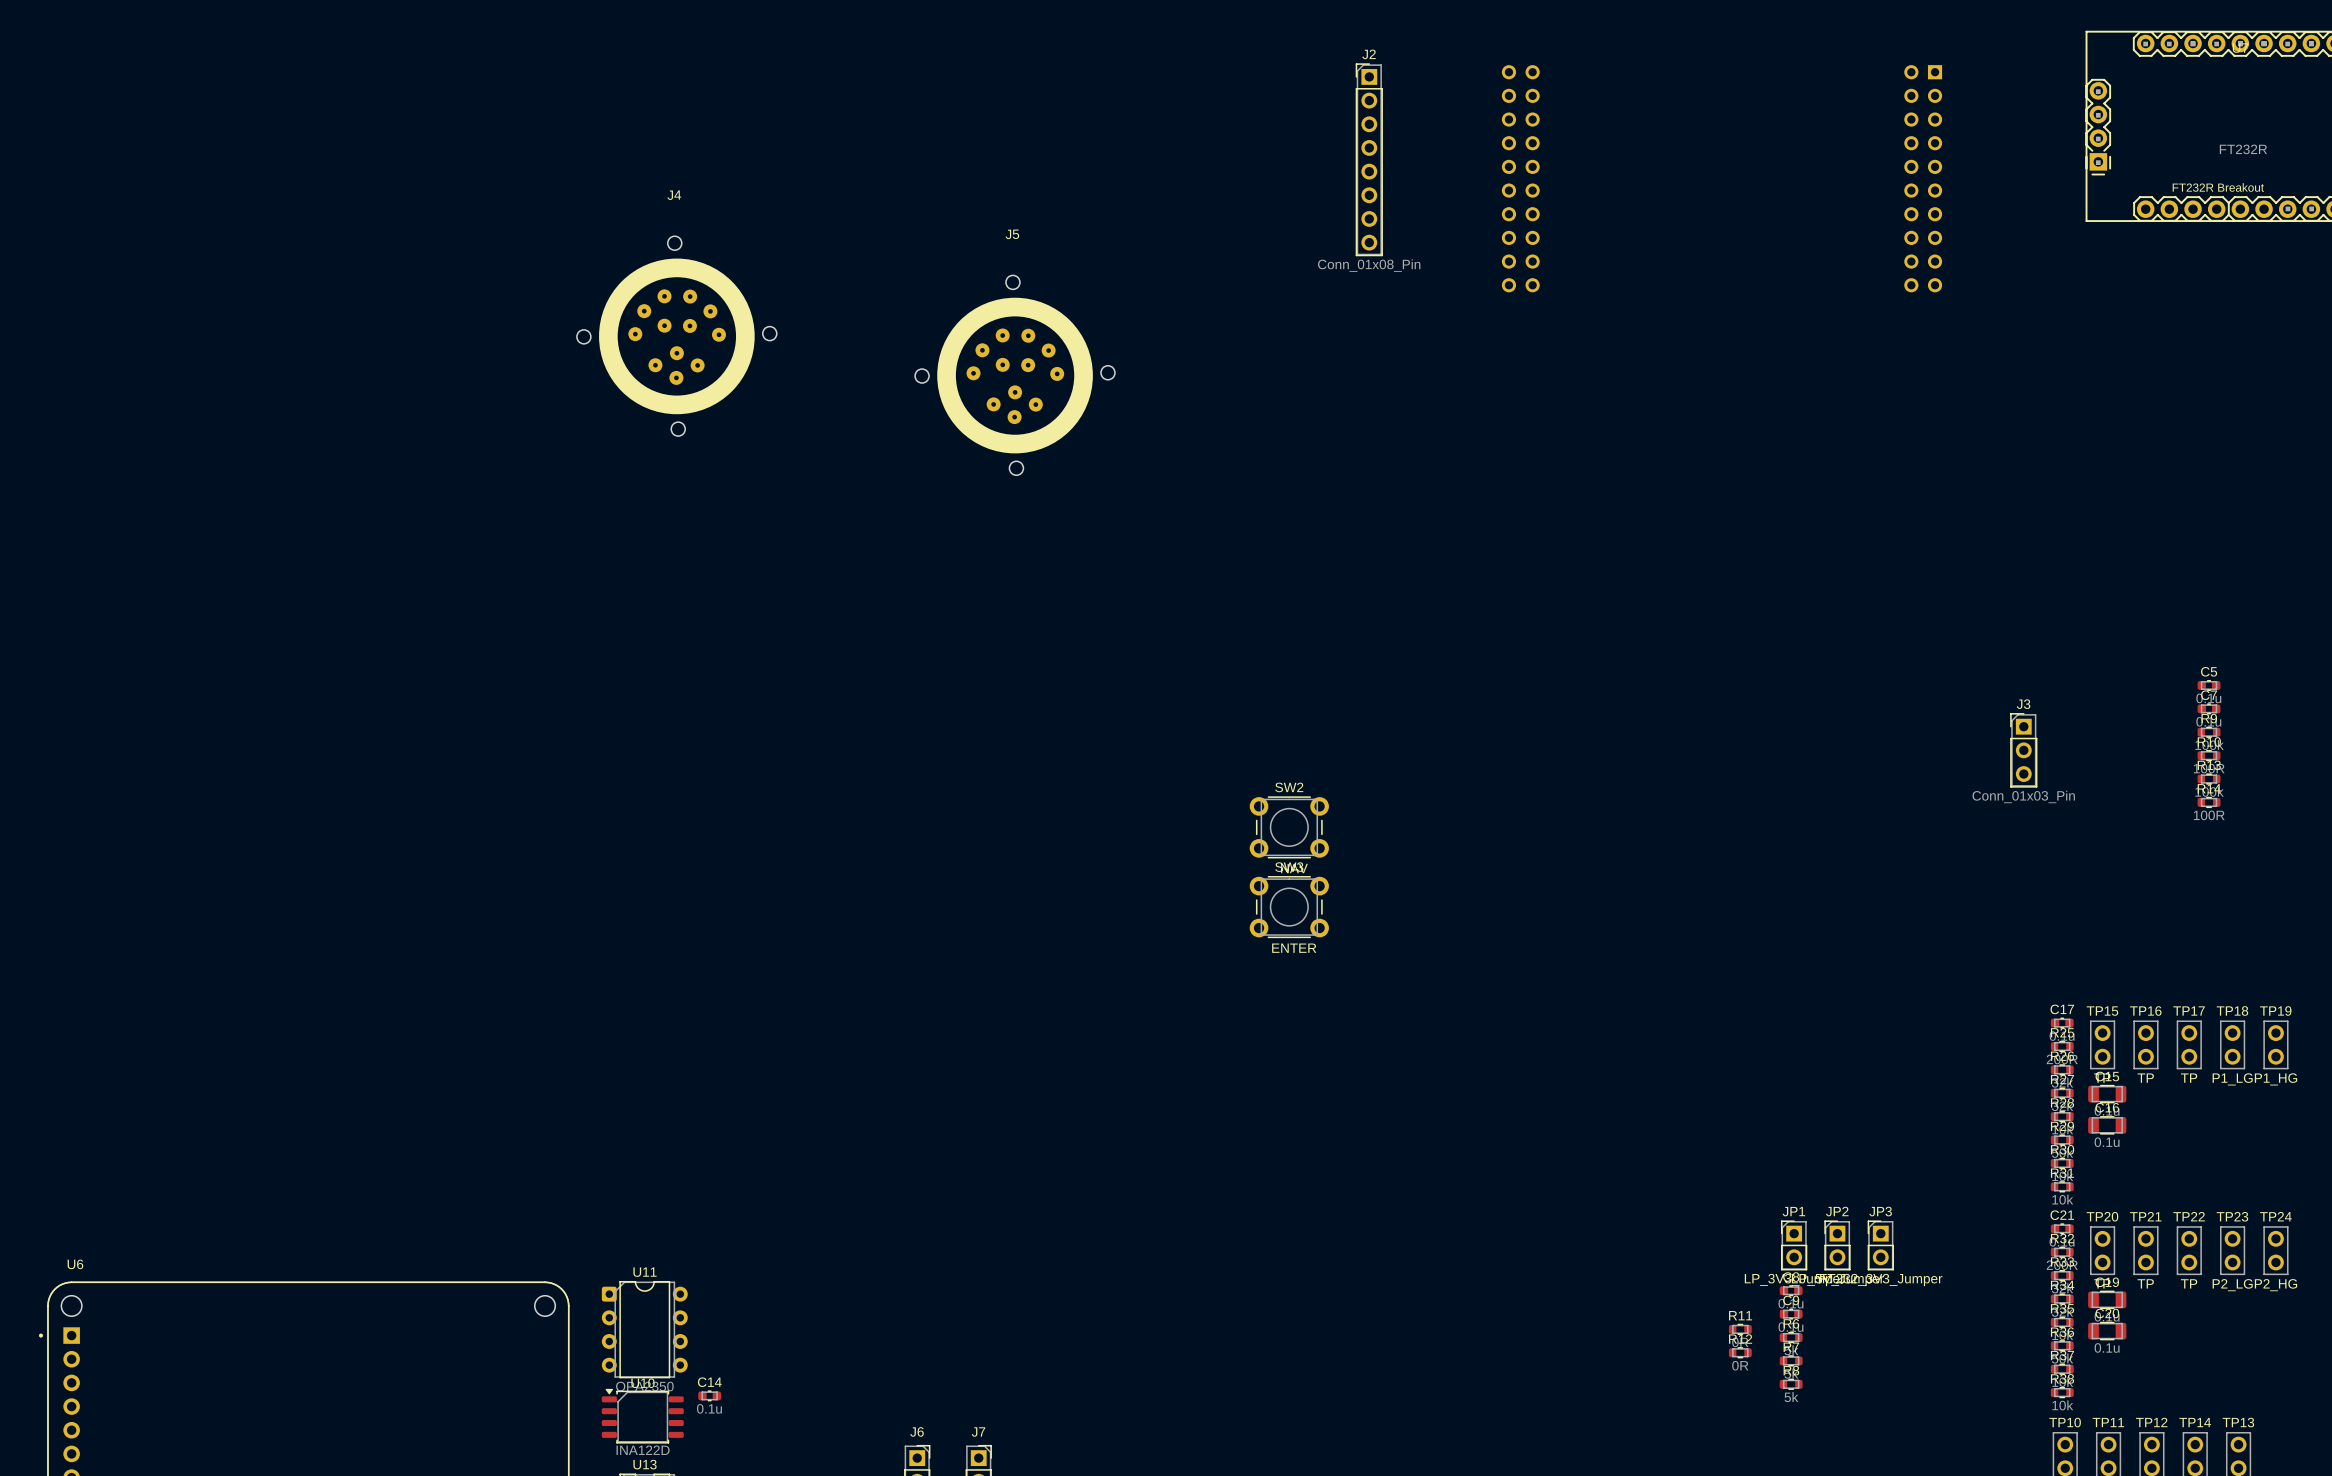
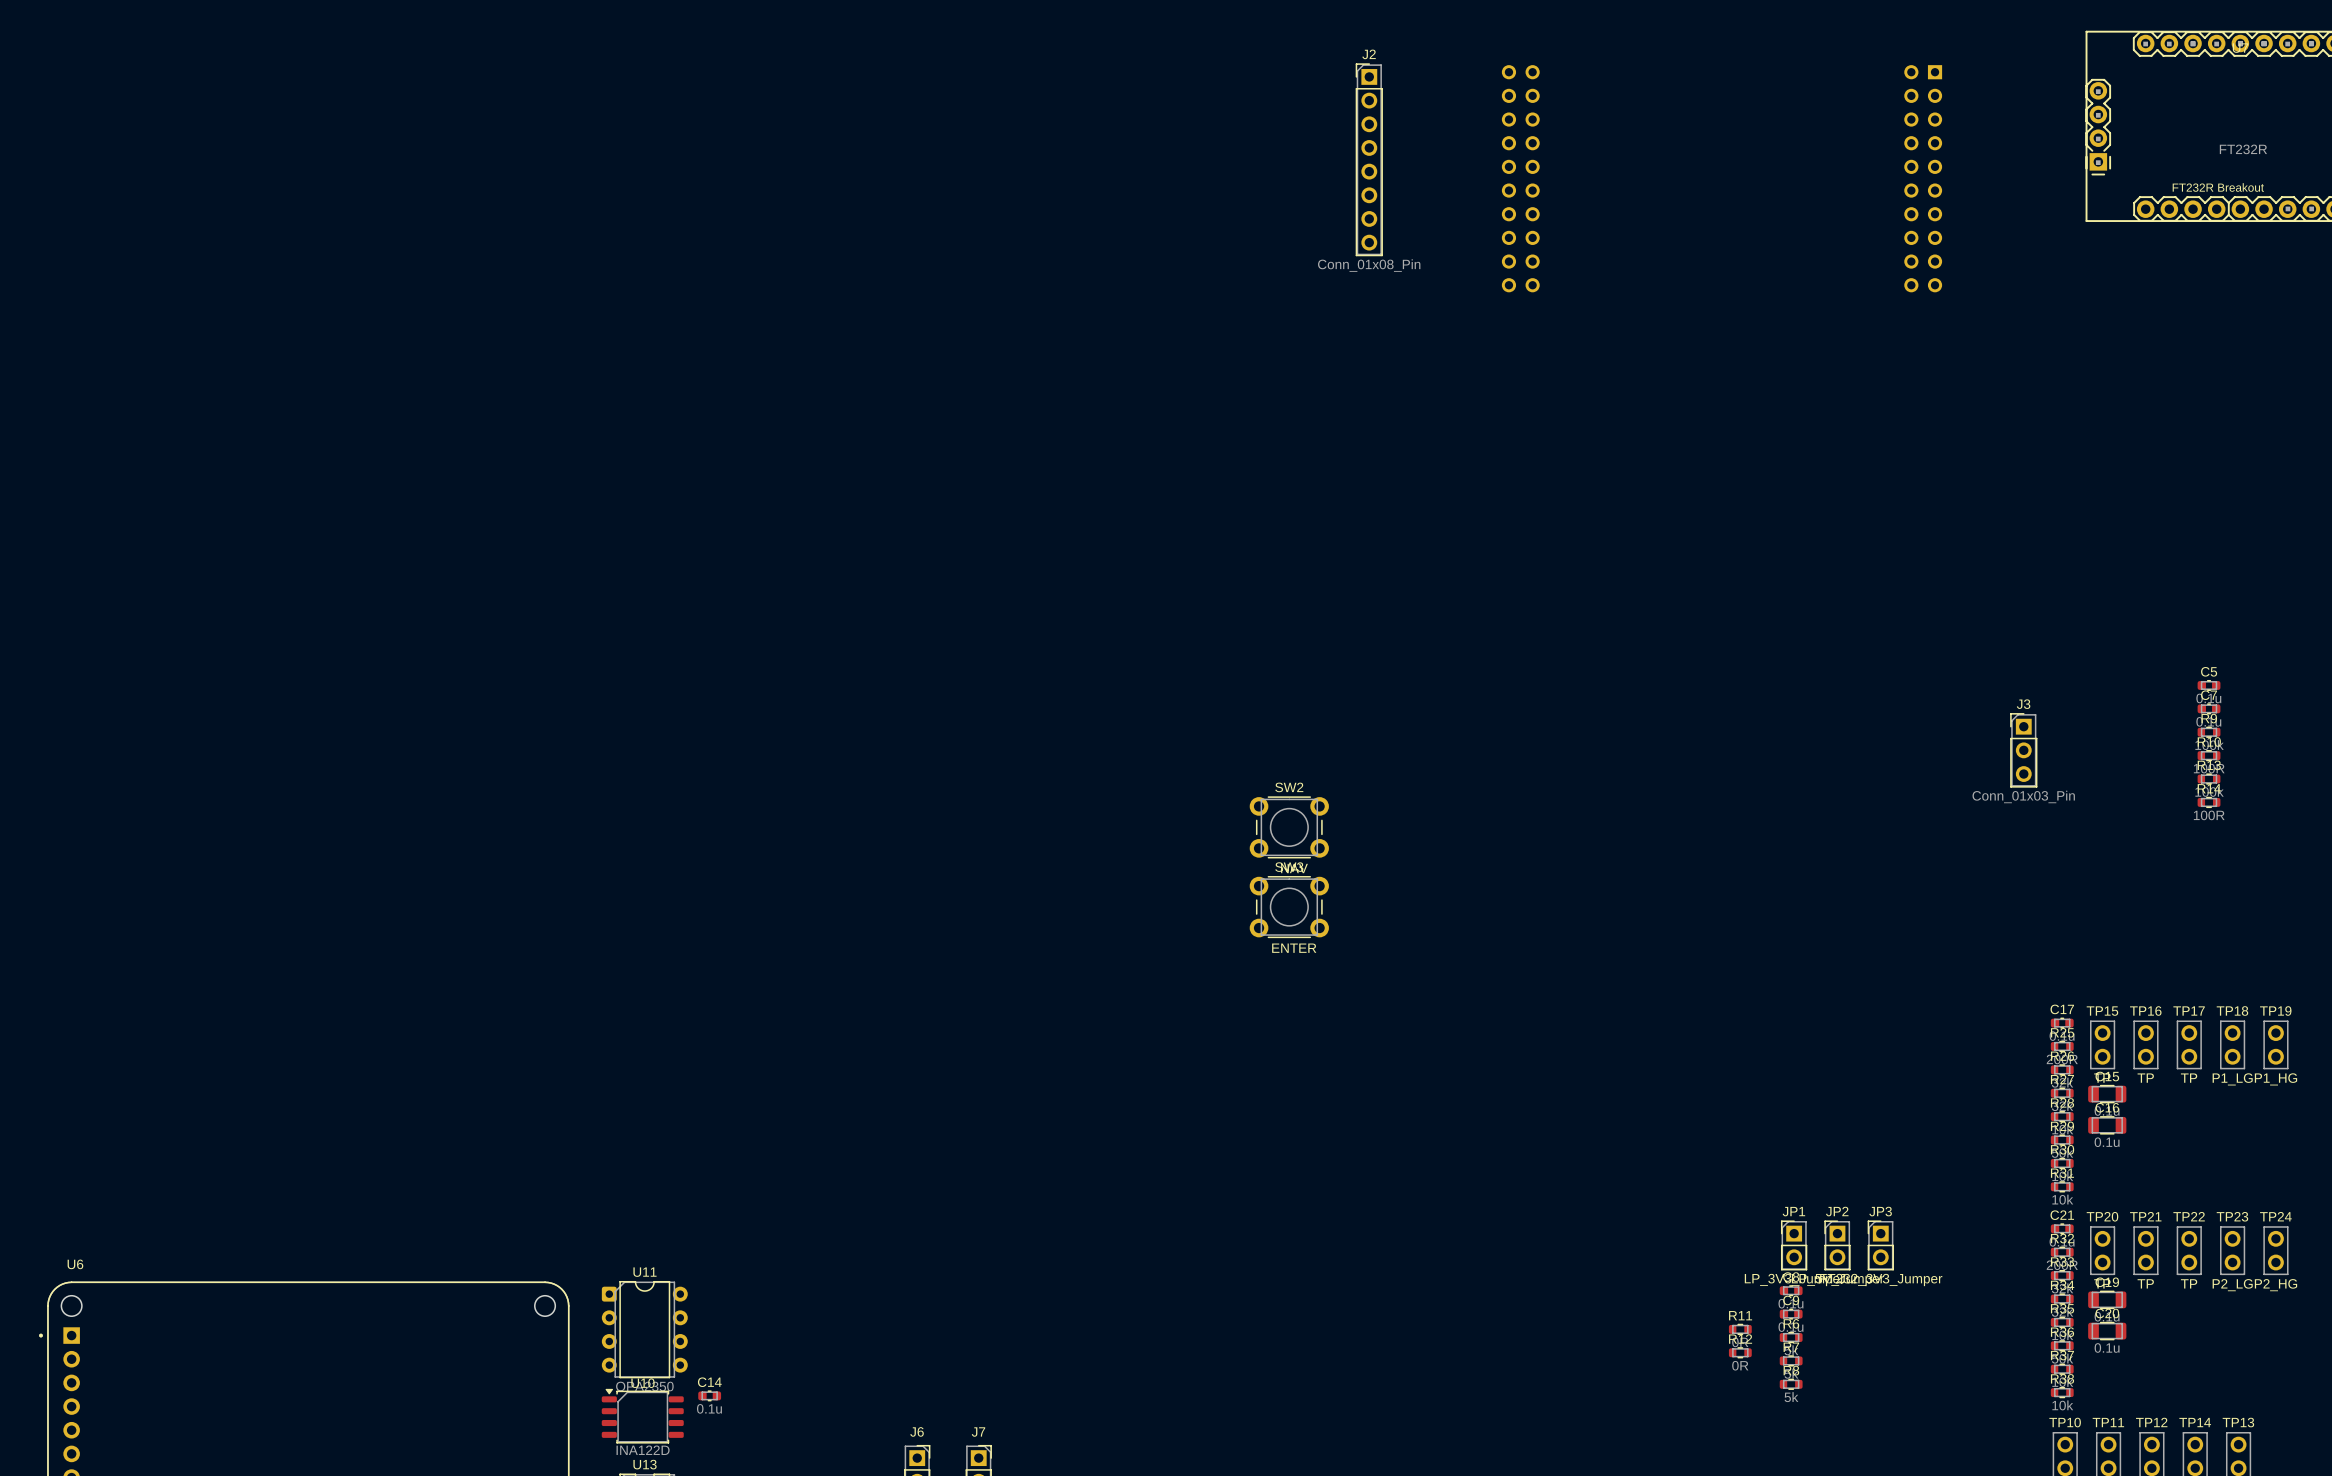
J4: (676, 336) -> none
J5: (1015, 375) -> none

